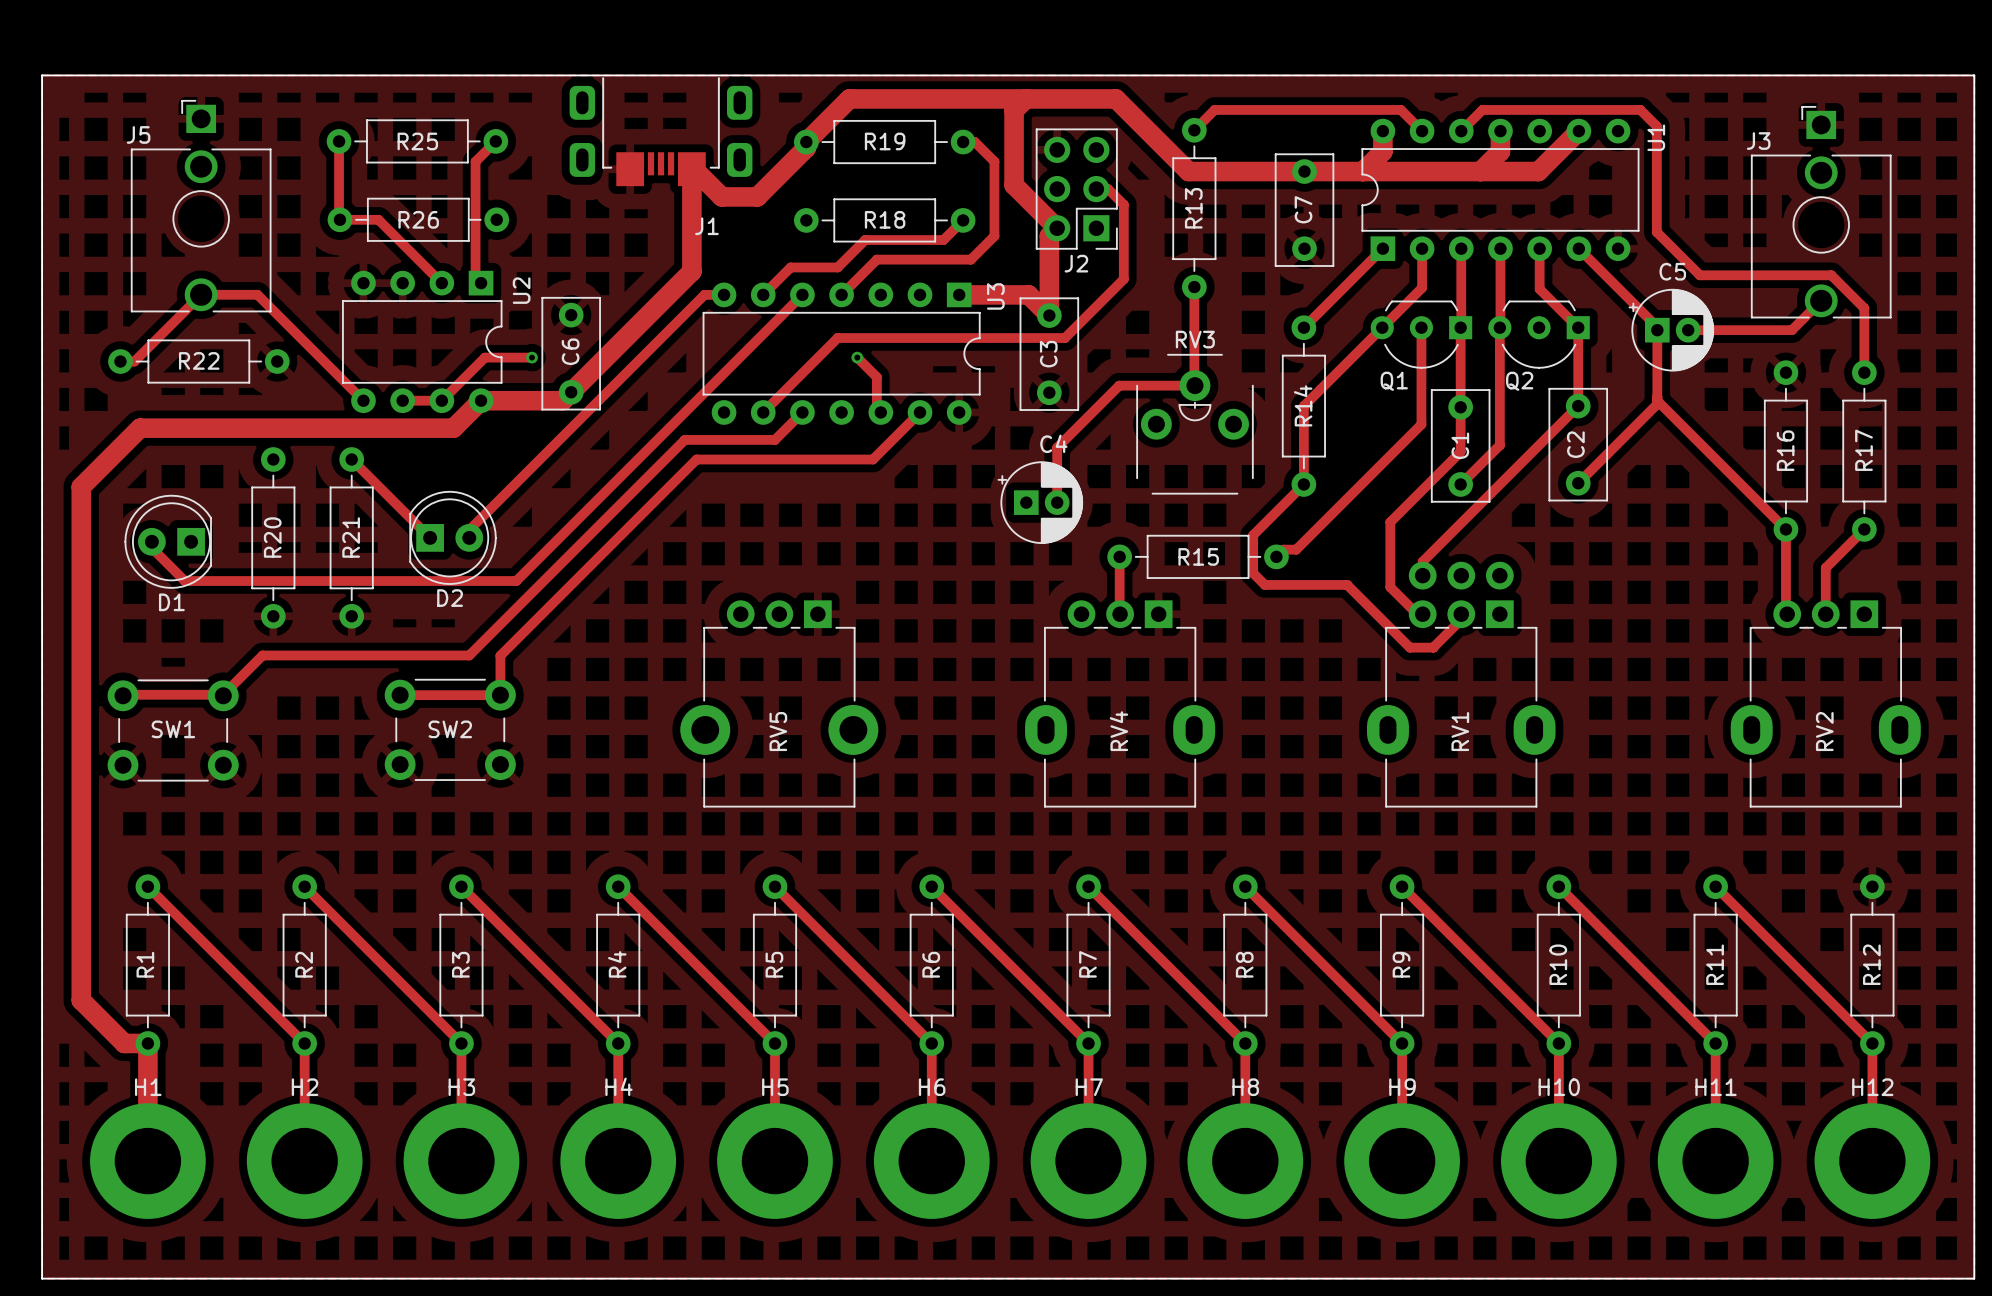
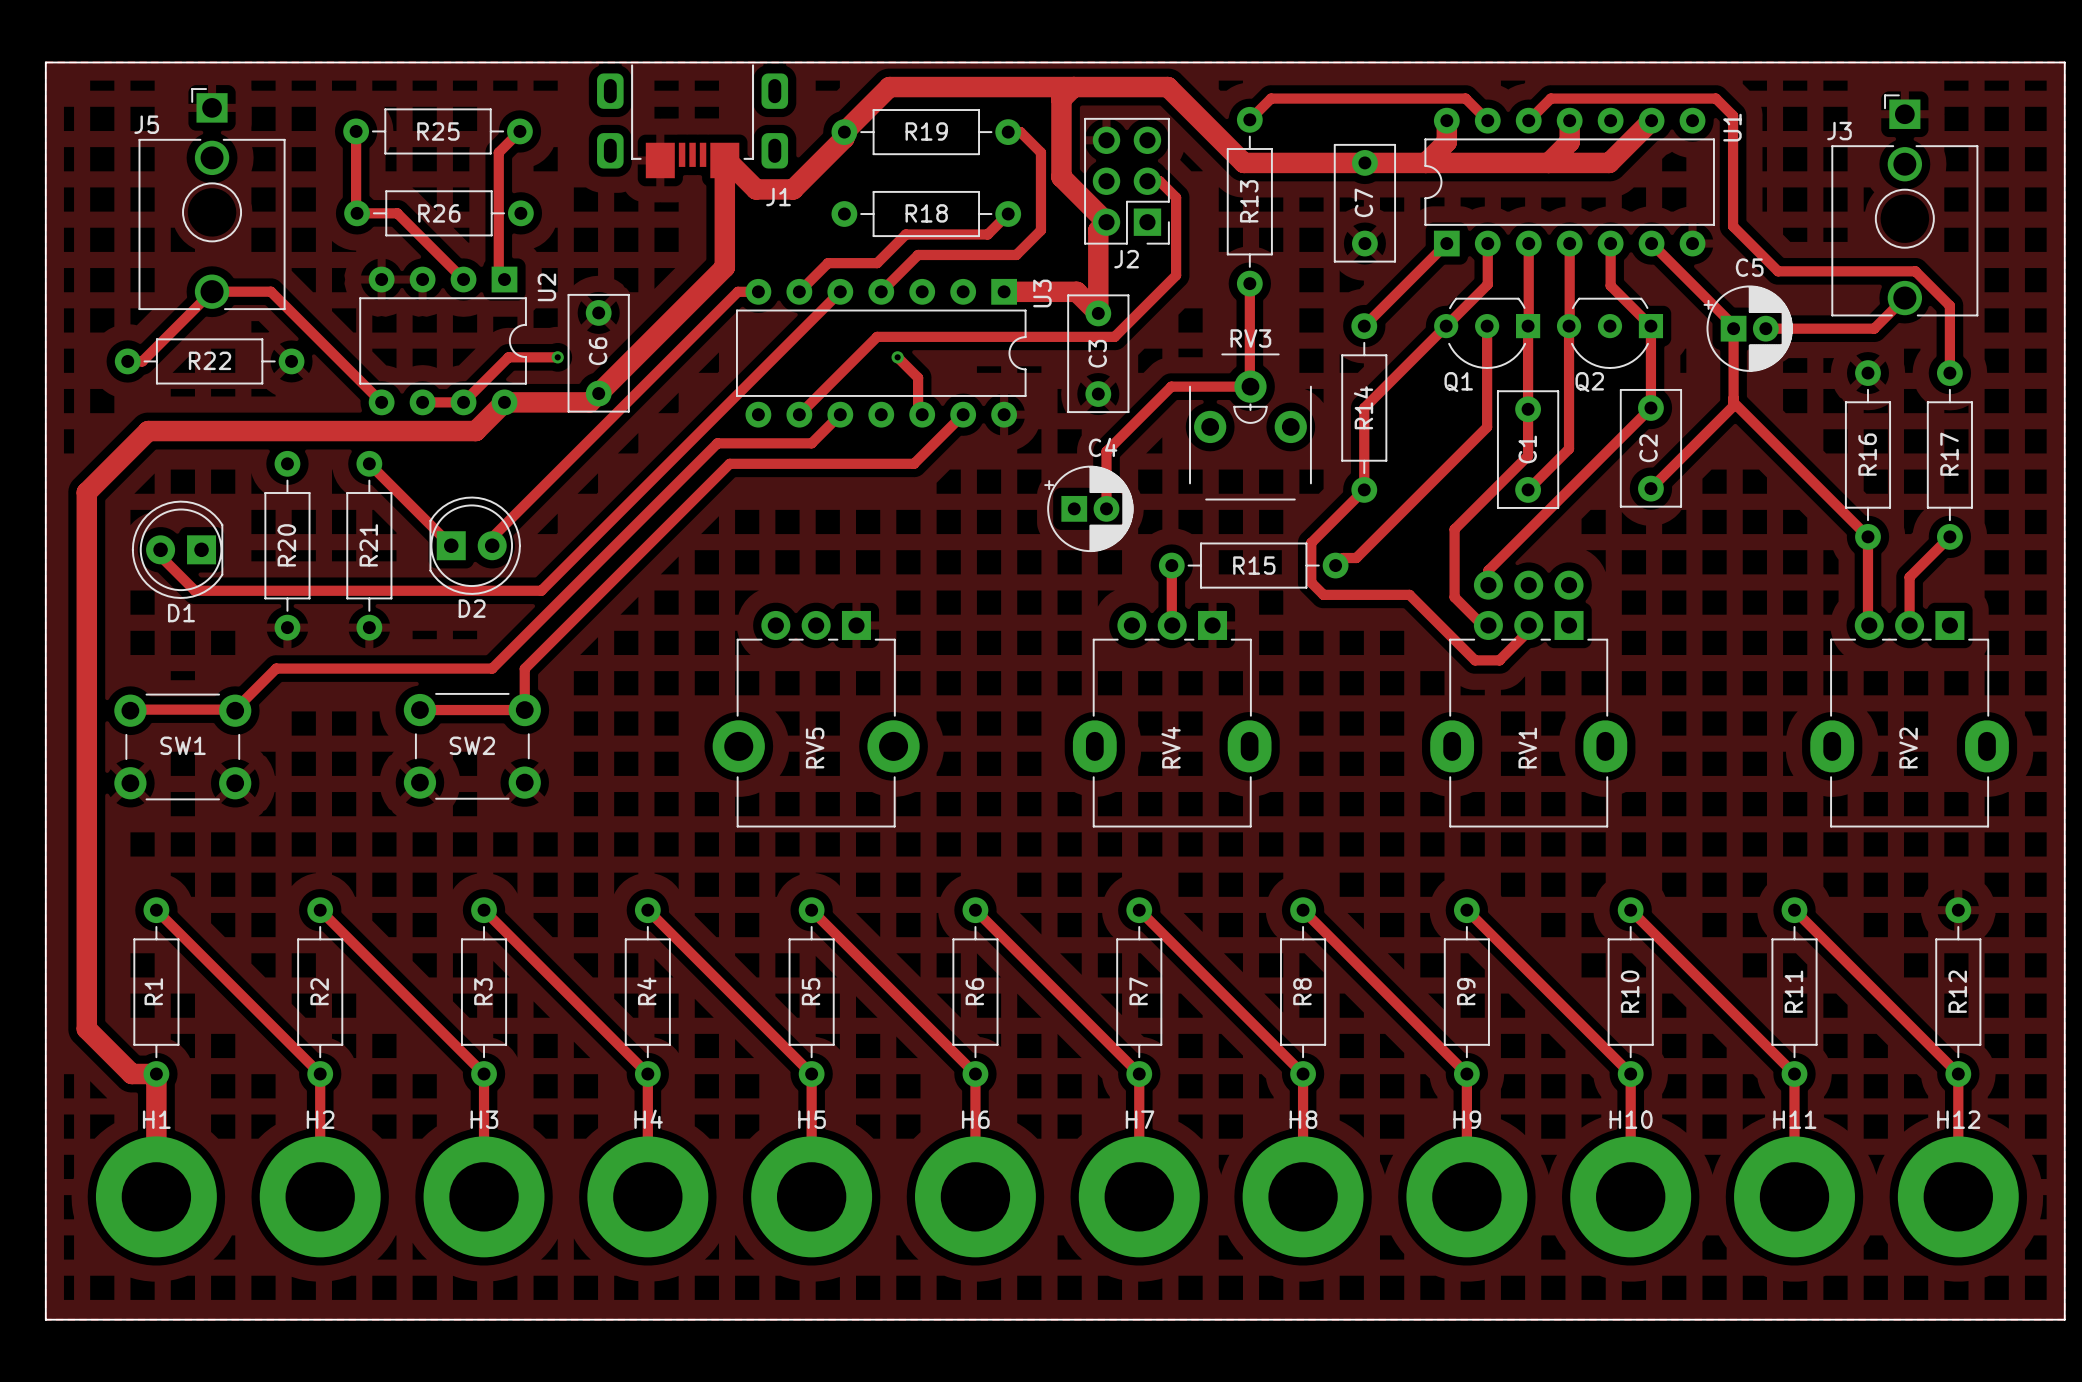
J1 name position: J1 (706, 226) -> J1 (778, 197)

